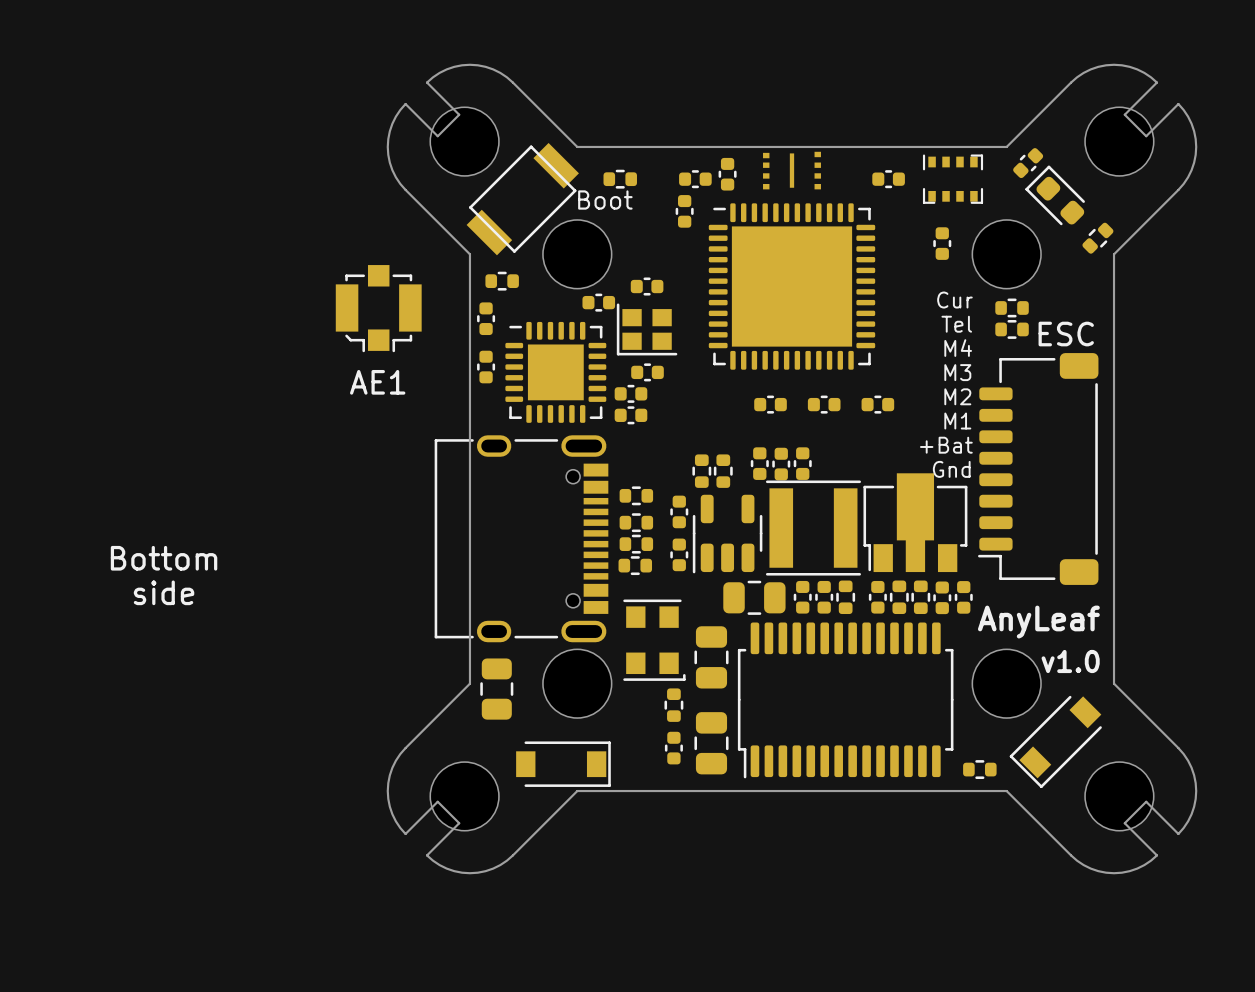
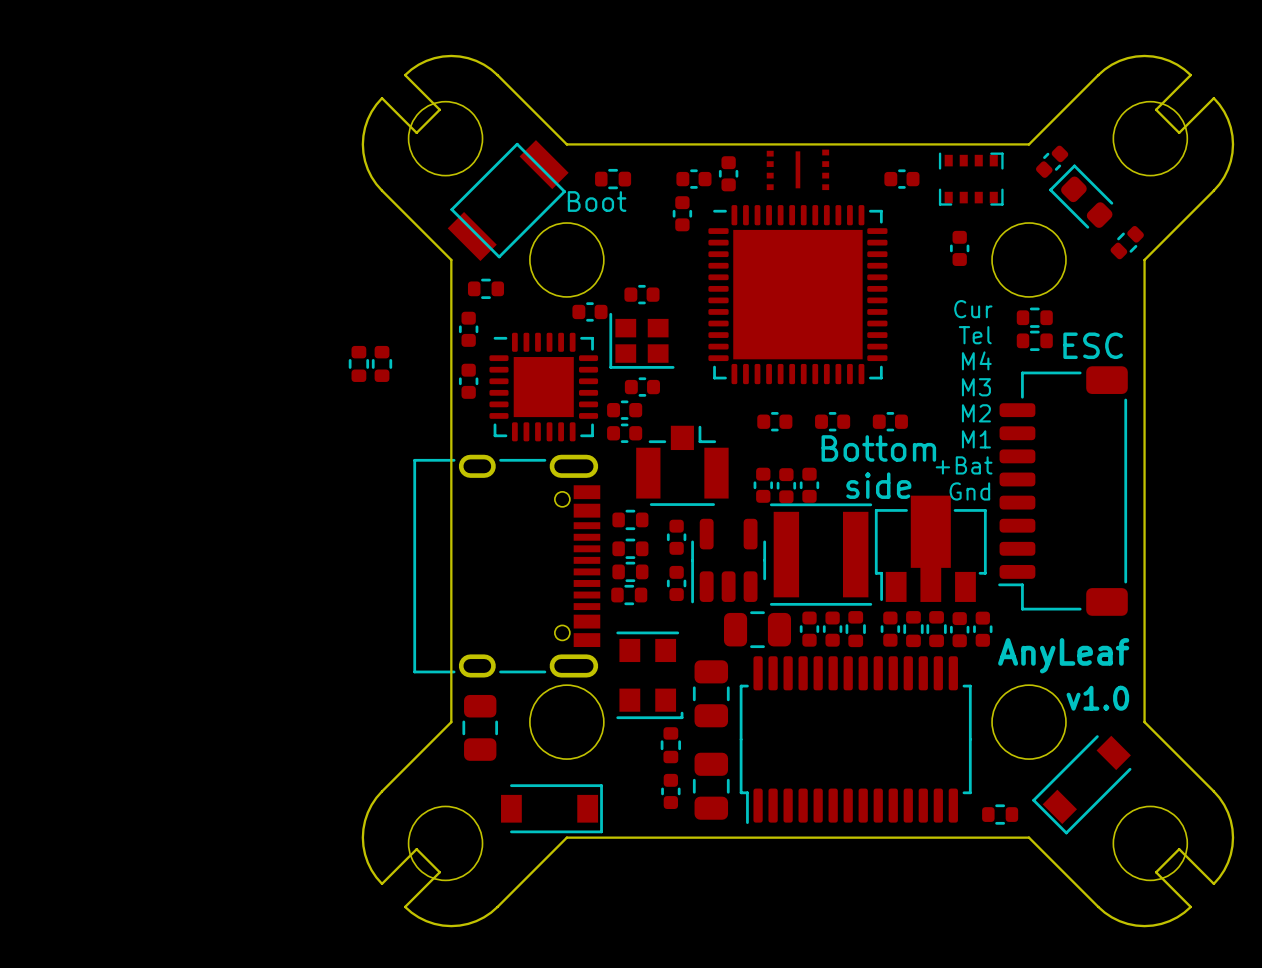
AE1: (378, 308) -> none
part: none -> (358, 363)
part: none -> (382, 363)
text: none -> Bottom (878, 448)
part: none -> (682, 465)
text: none -> side (878, 485)
part: (701, 471) -> none
part: (723, 471) -> none
text: Bottom (164, 558) -> none
text: side (164, 592) -> none

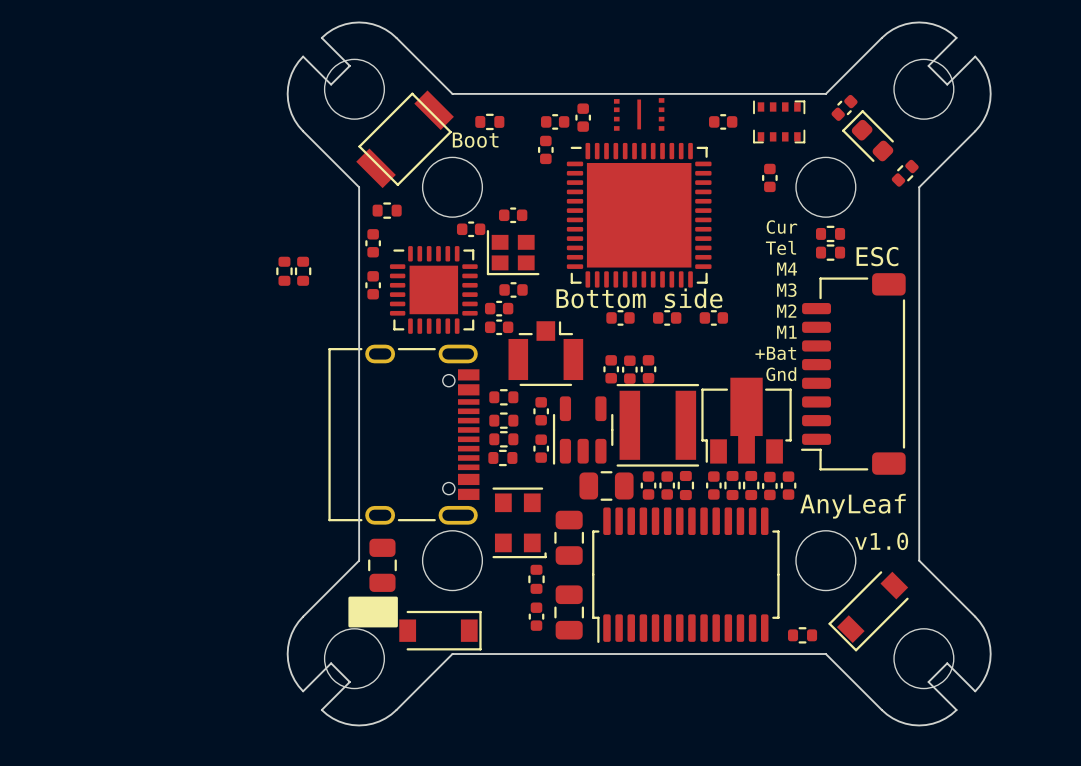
text: none -> Bottom side (639, 298)
text: Bottom (878, 448) -> none
text: side (878, 485) -> none
drawing: none -> [348, 596, 398, 628]

